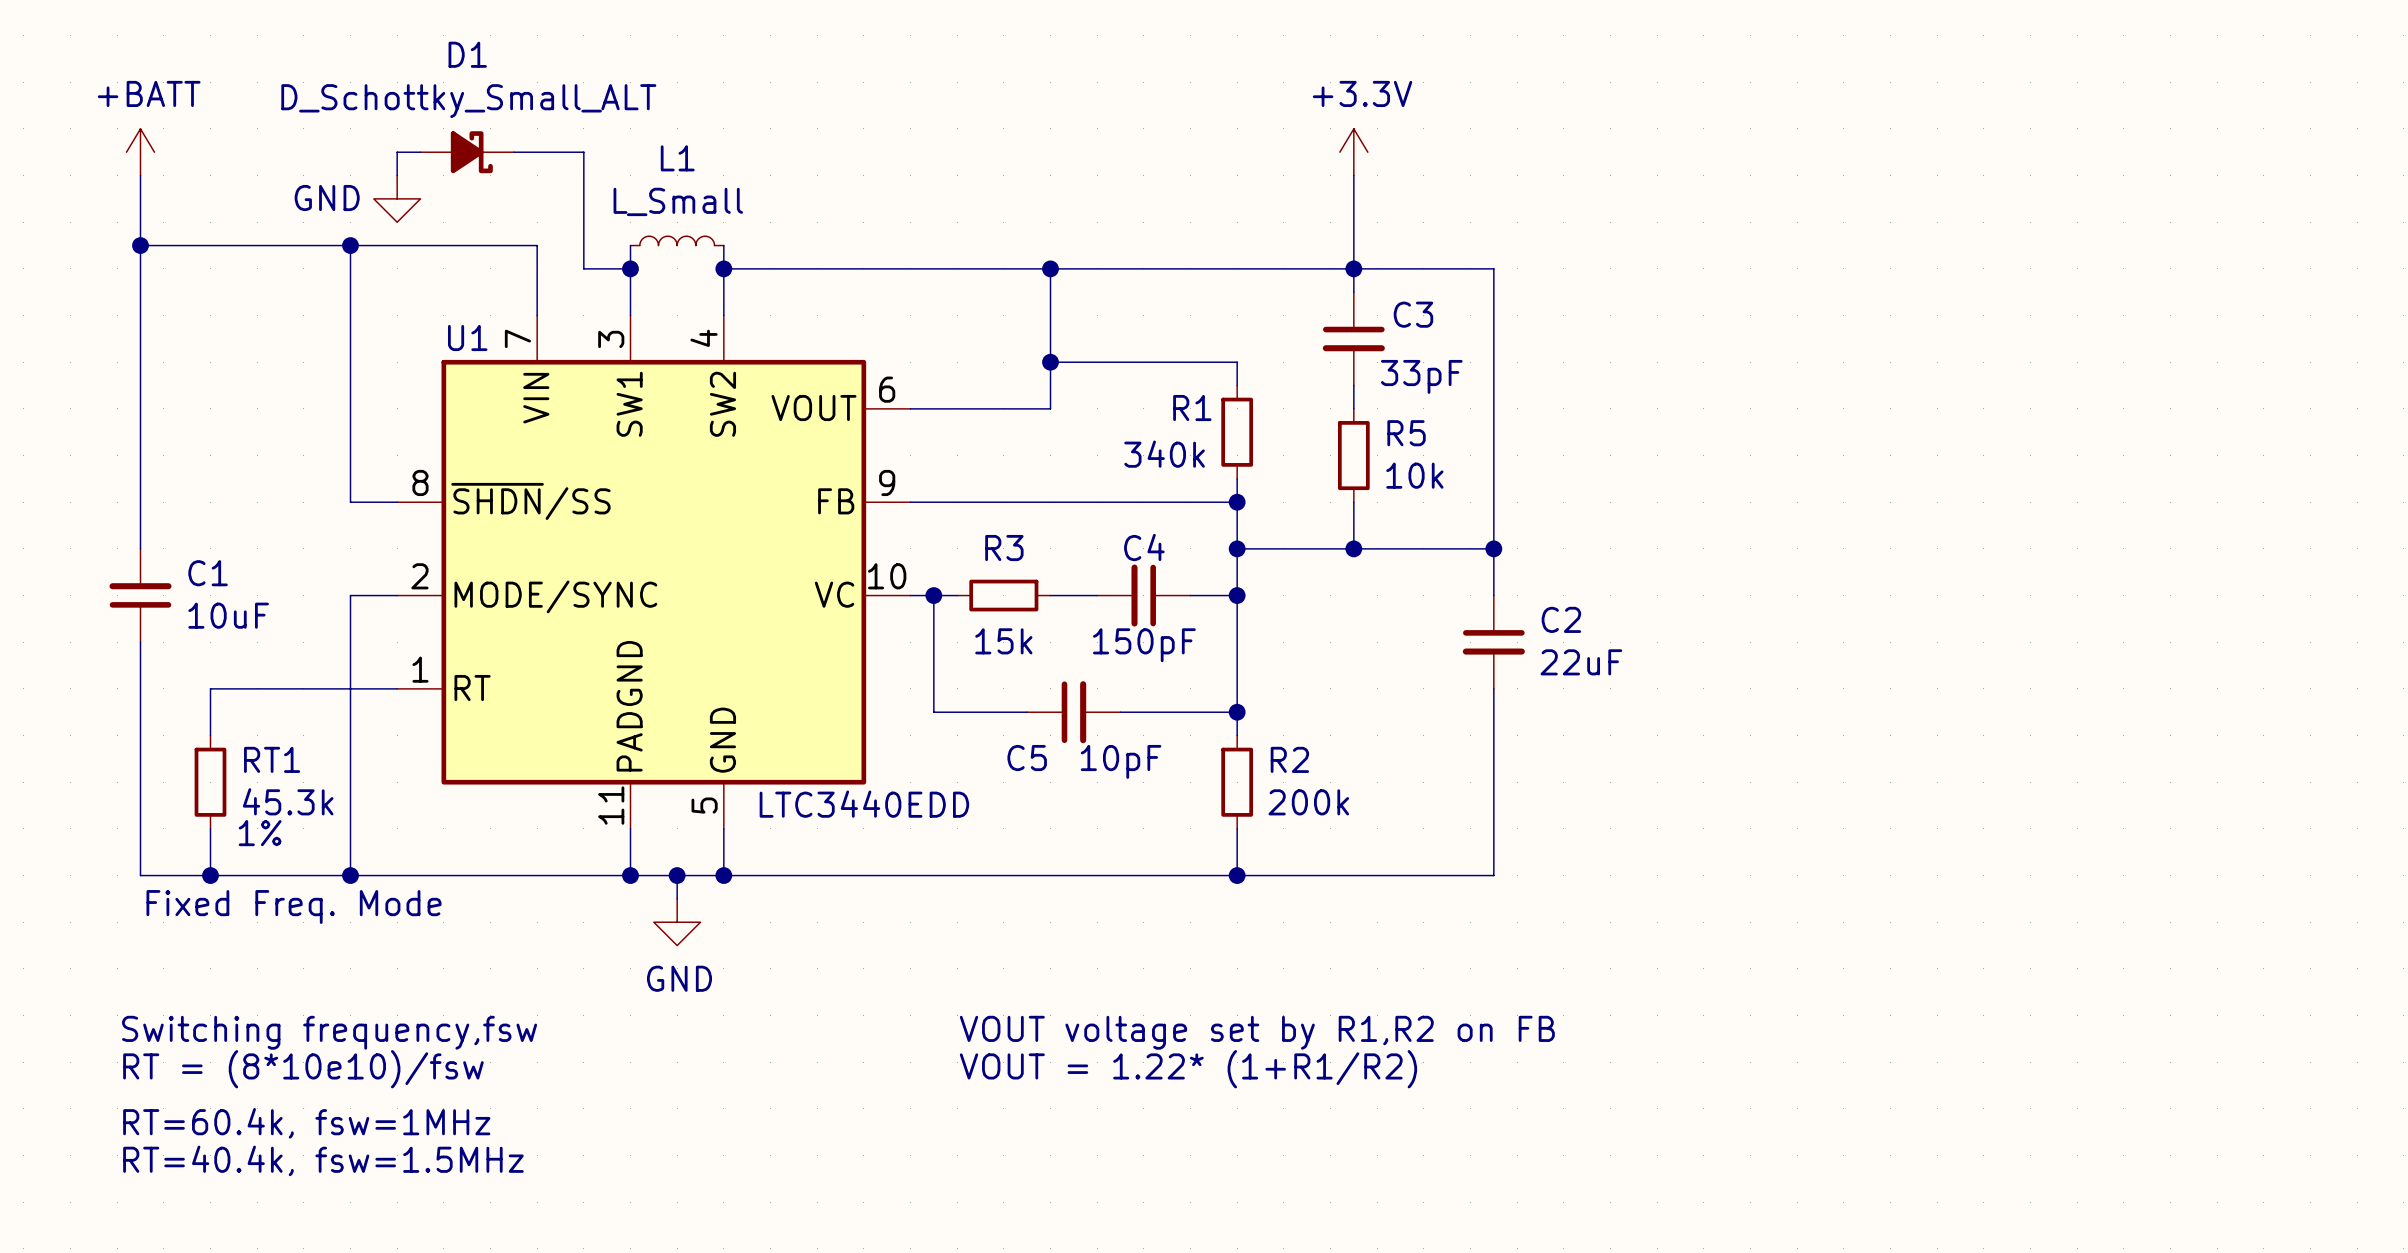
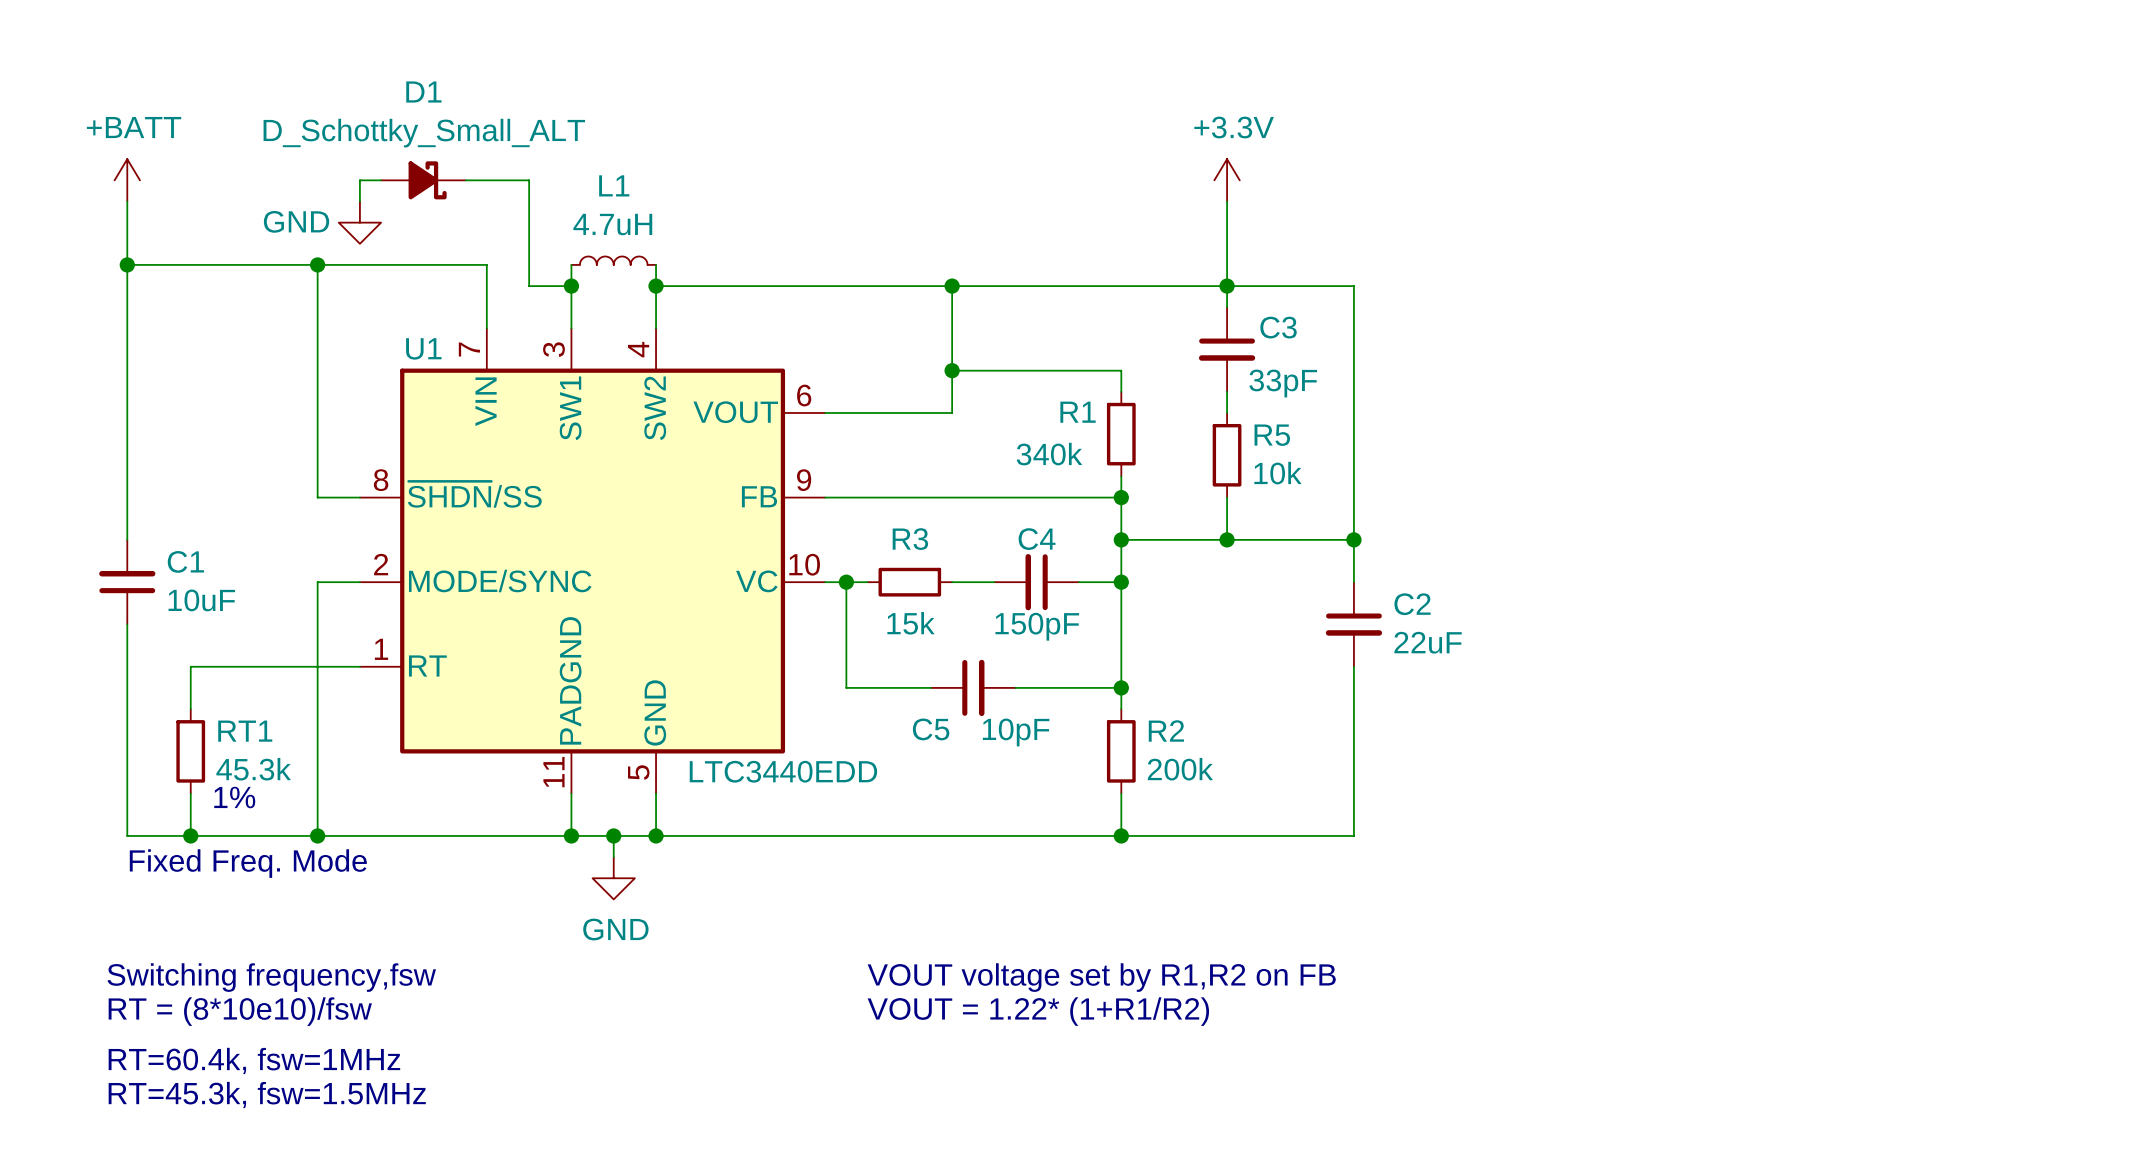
L1 value: L_Small (678, 201) -> 4.7uH (612, 224)
text: RT=40.4k, fsw=1.5MHz (323, 1160) -> RT=45.3k, fsw=1.5MHz (267, 1094)

